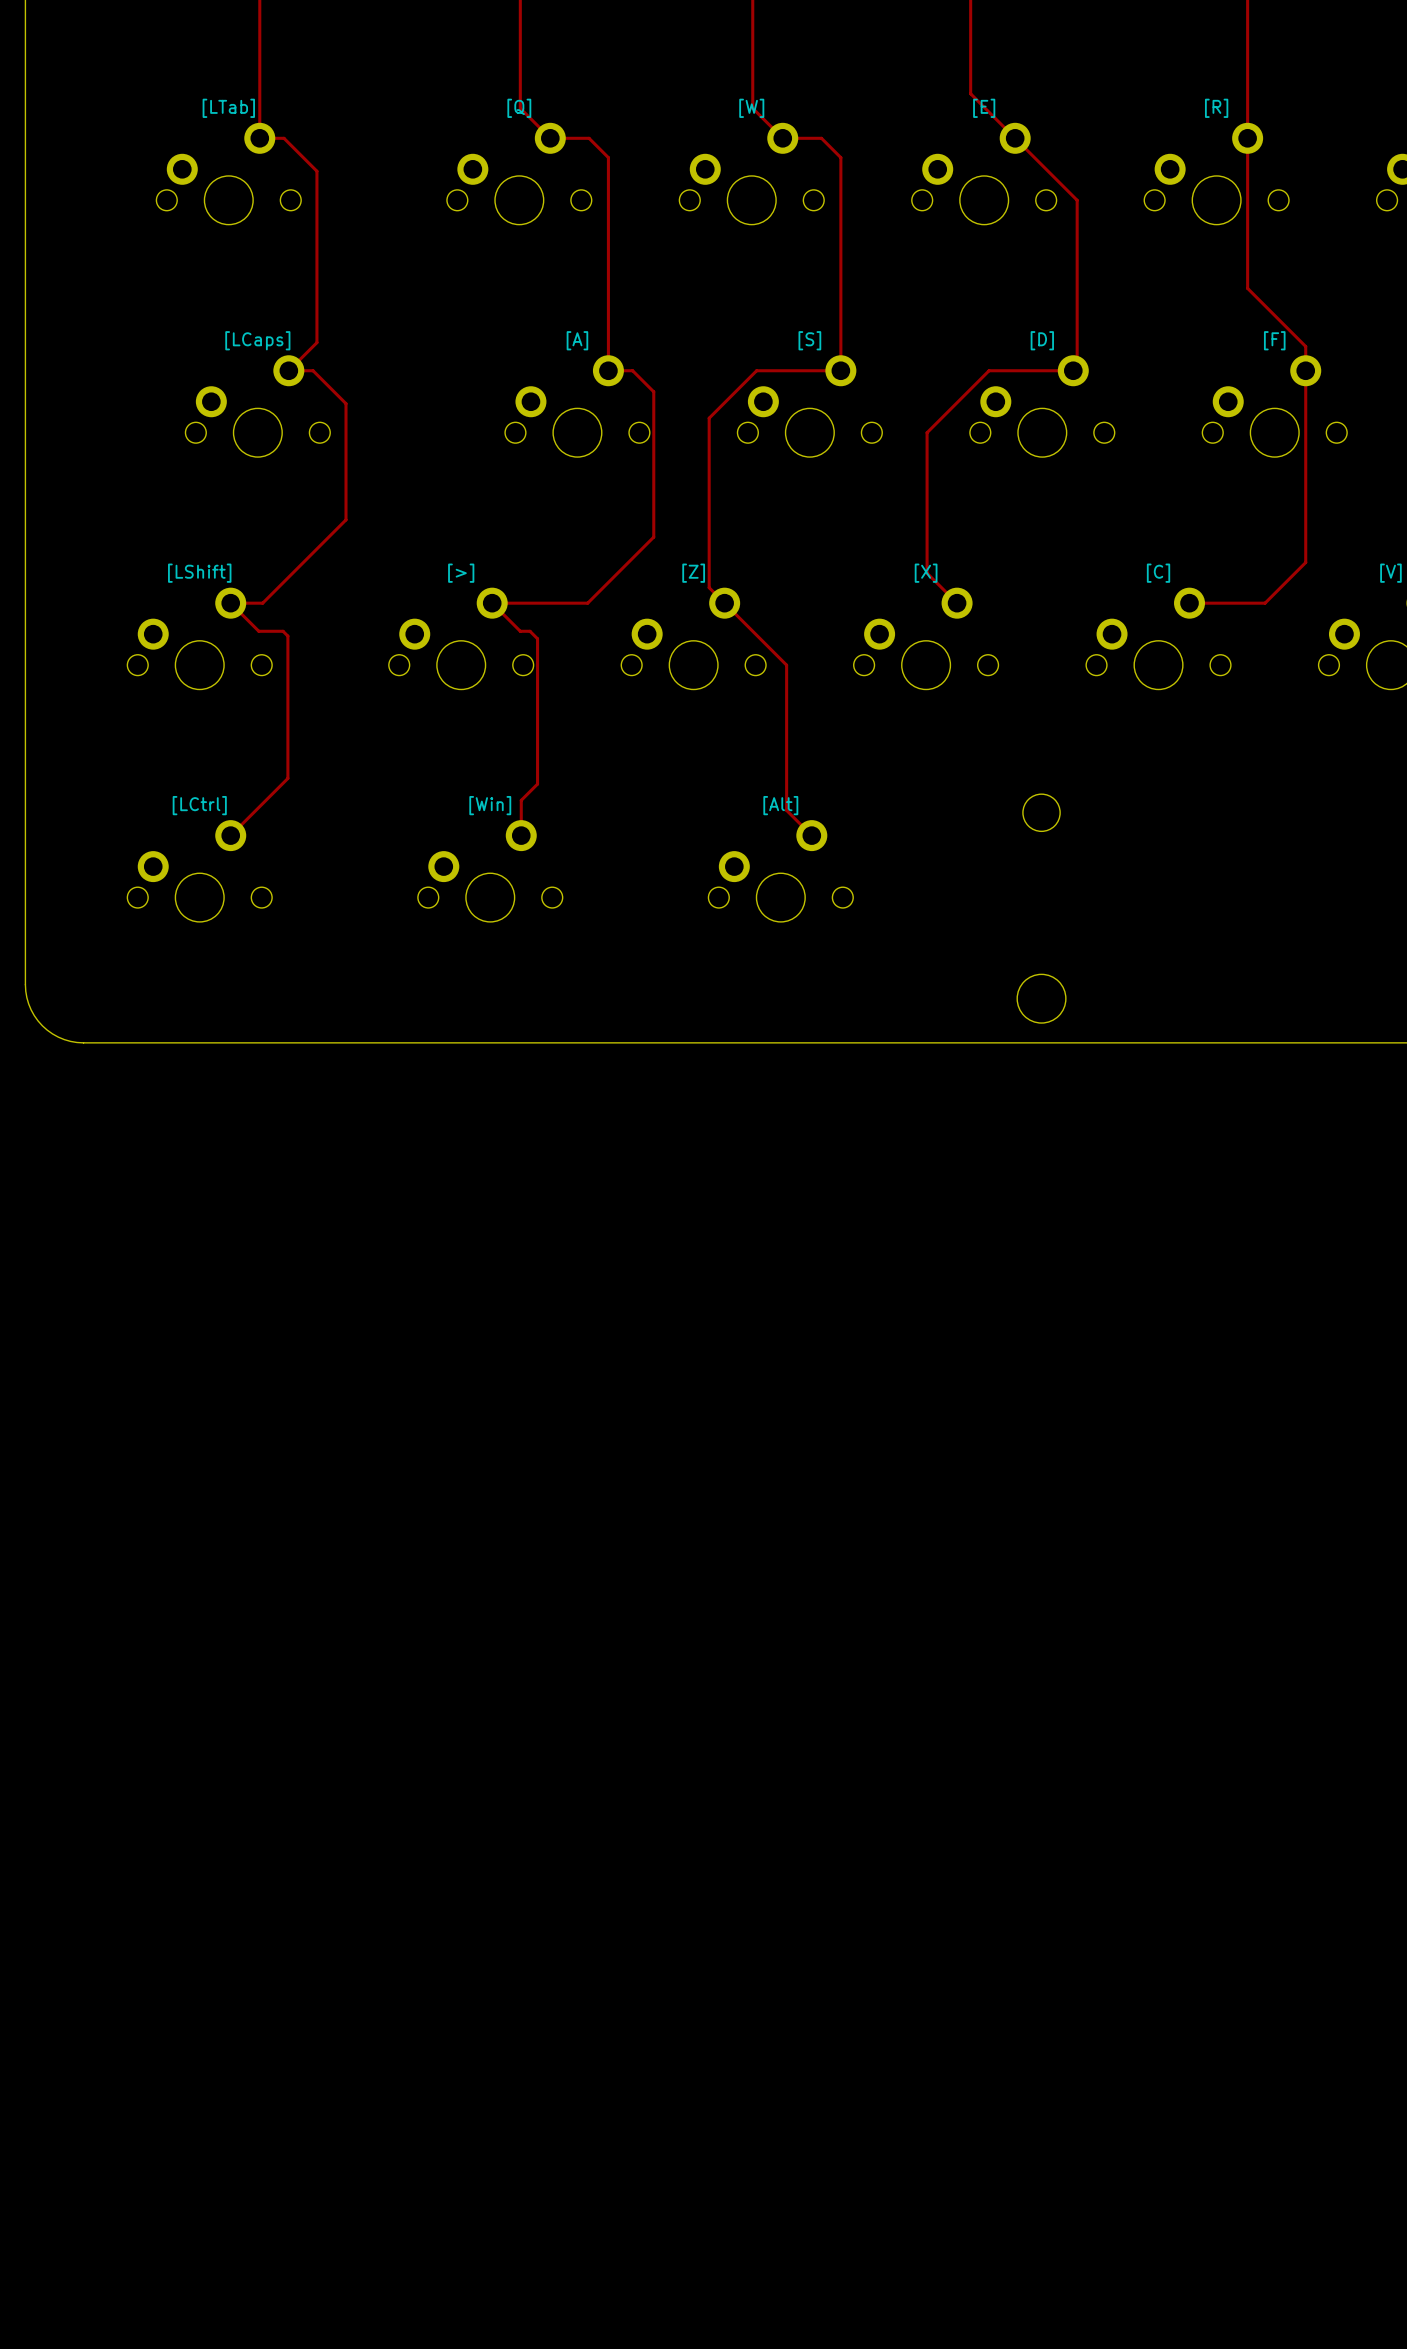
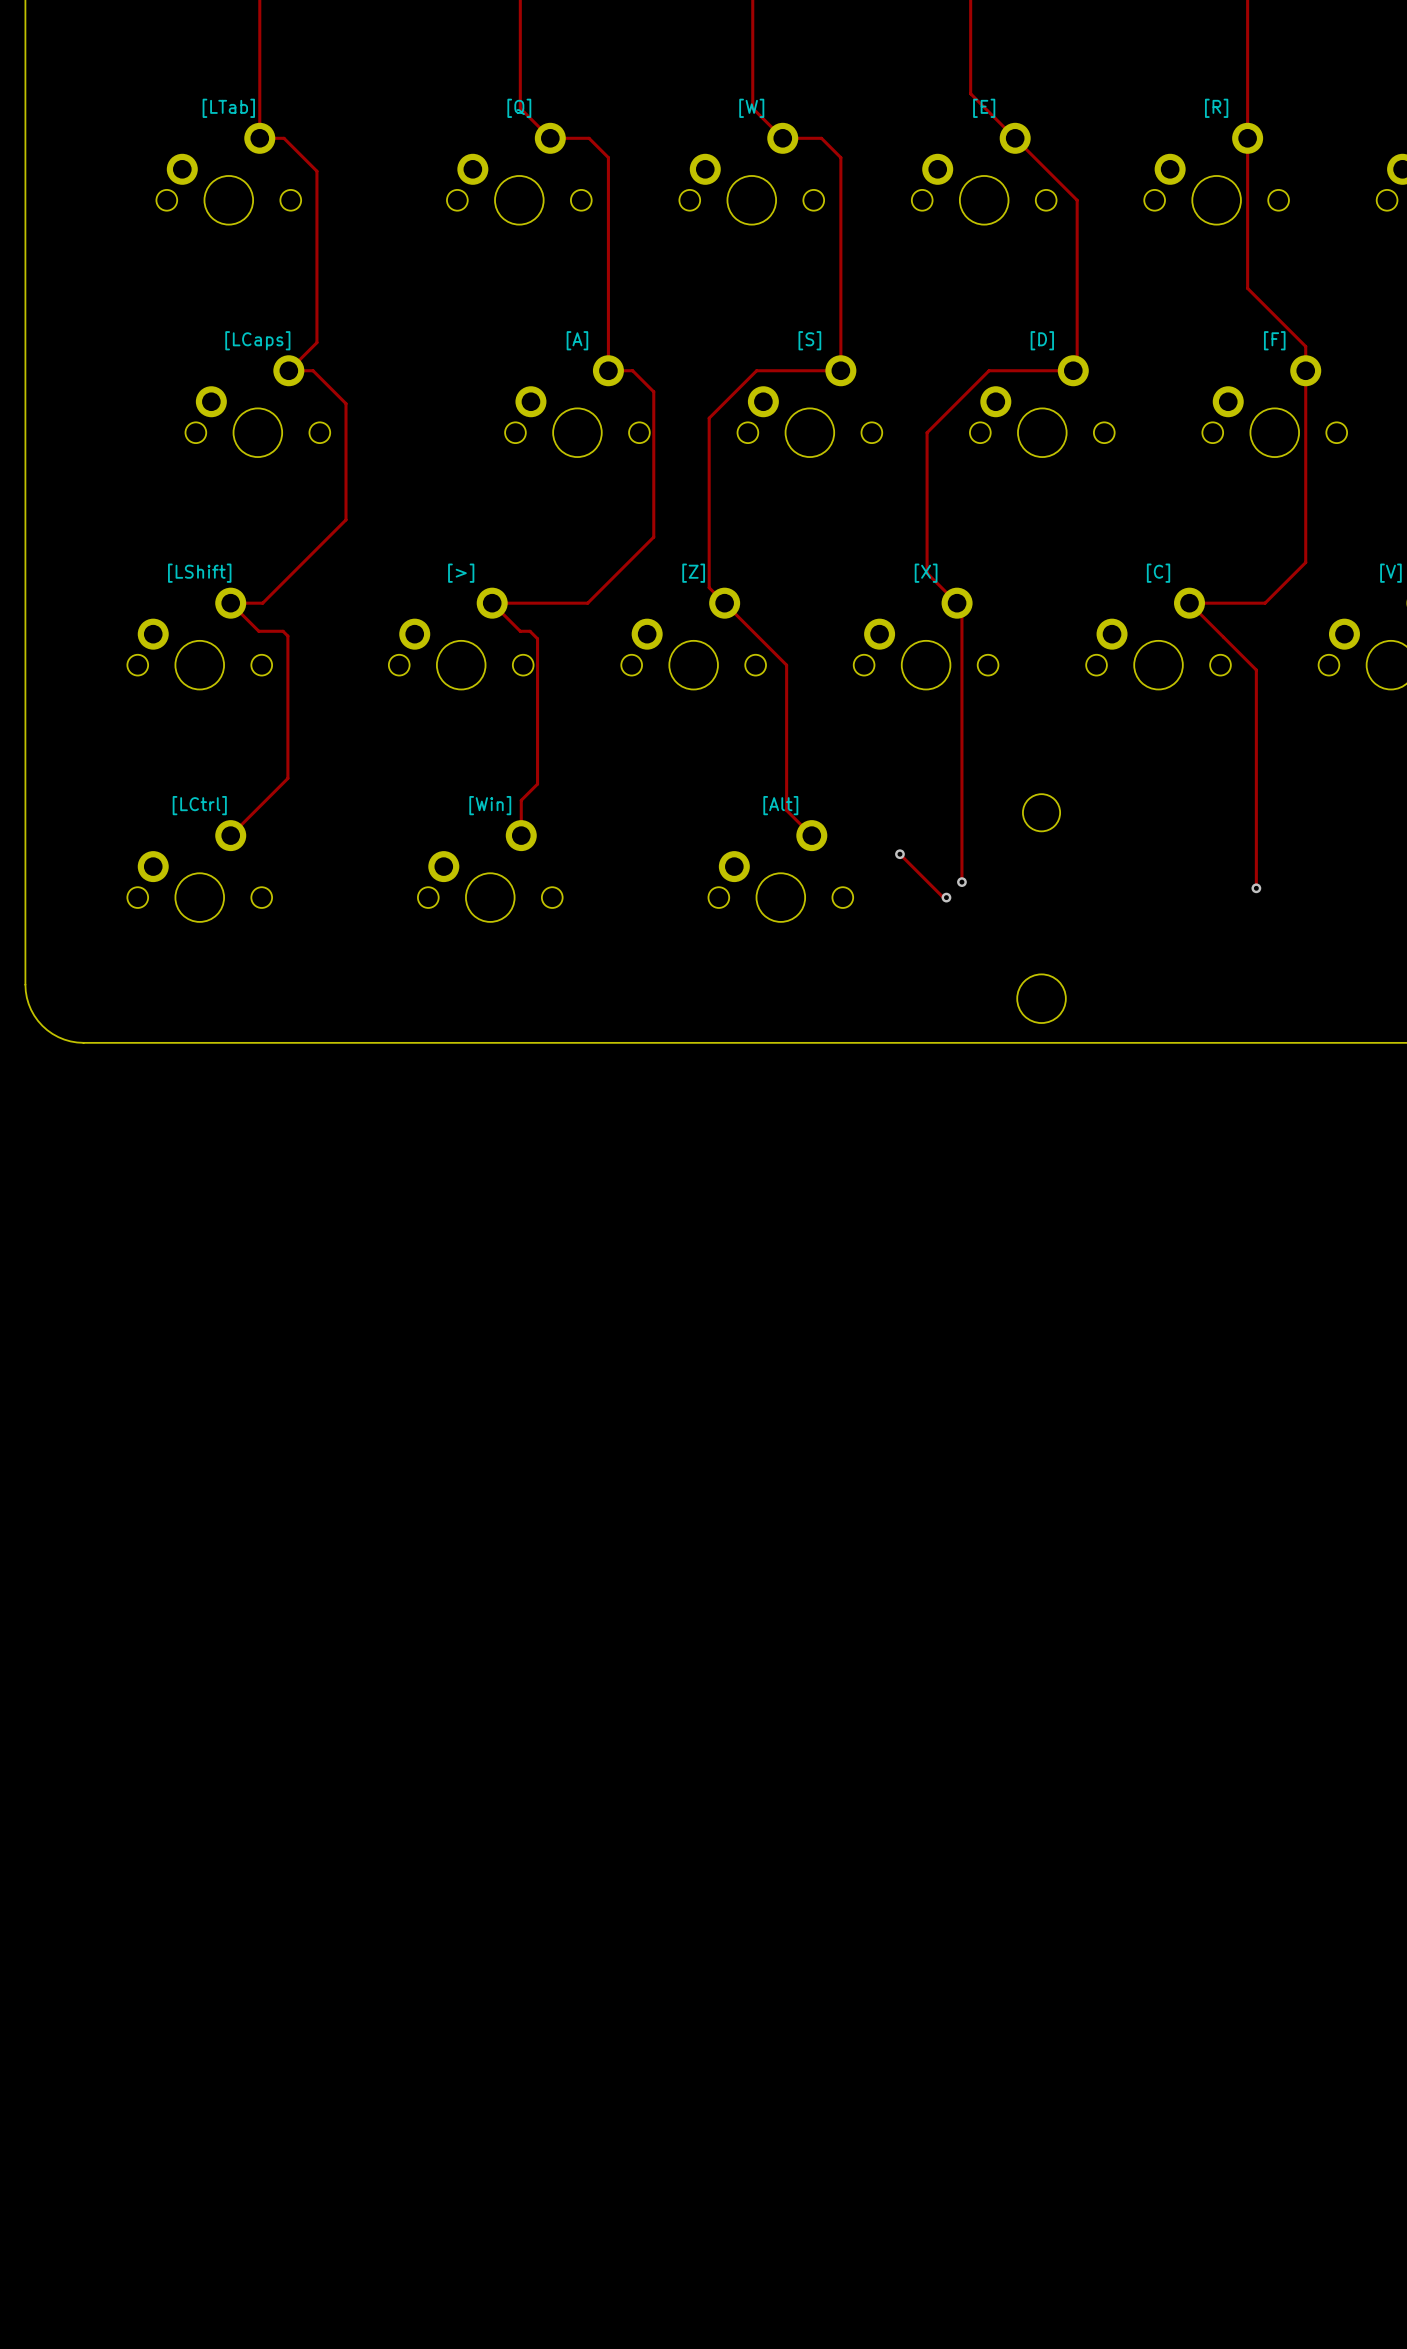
track: none -> (957, 603) (961, 608) (961, 882)
track: none -> (1189, 603) (1256, 670) (1256, 888)
track: none -> (899, 854) (943, 897) (946, 897)
via: none -> (899, 854)
via: none -> (961, 882)
via: none -> (1256, 888)
via: none -> (946, 897)

